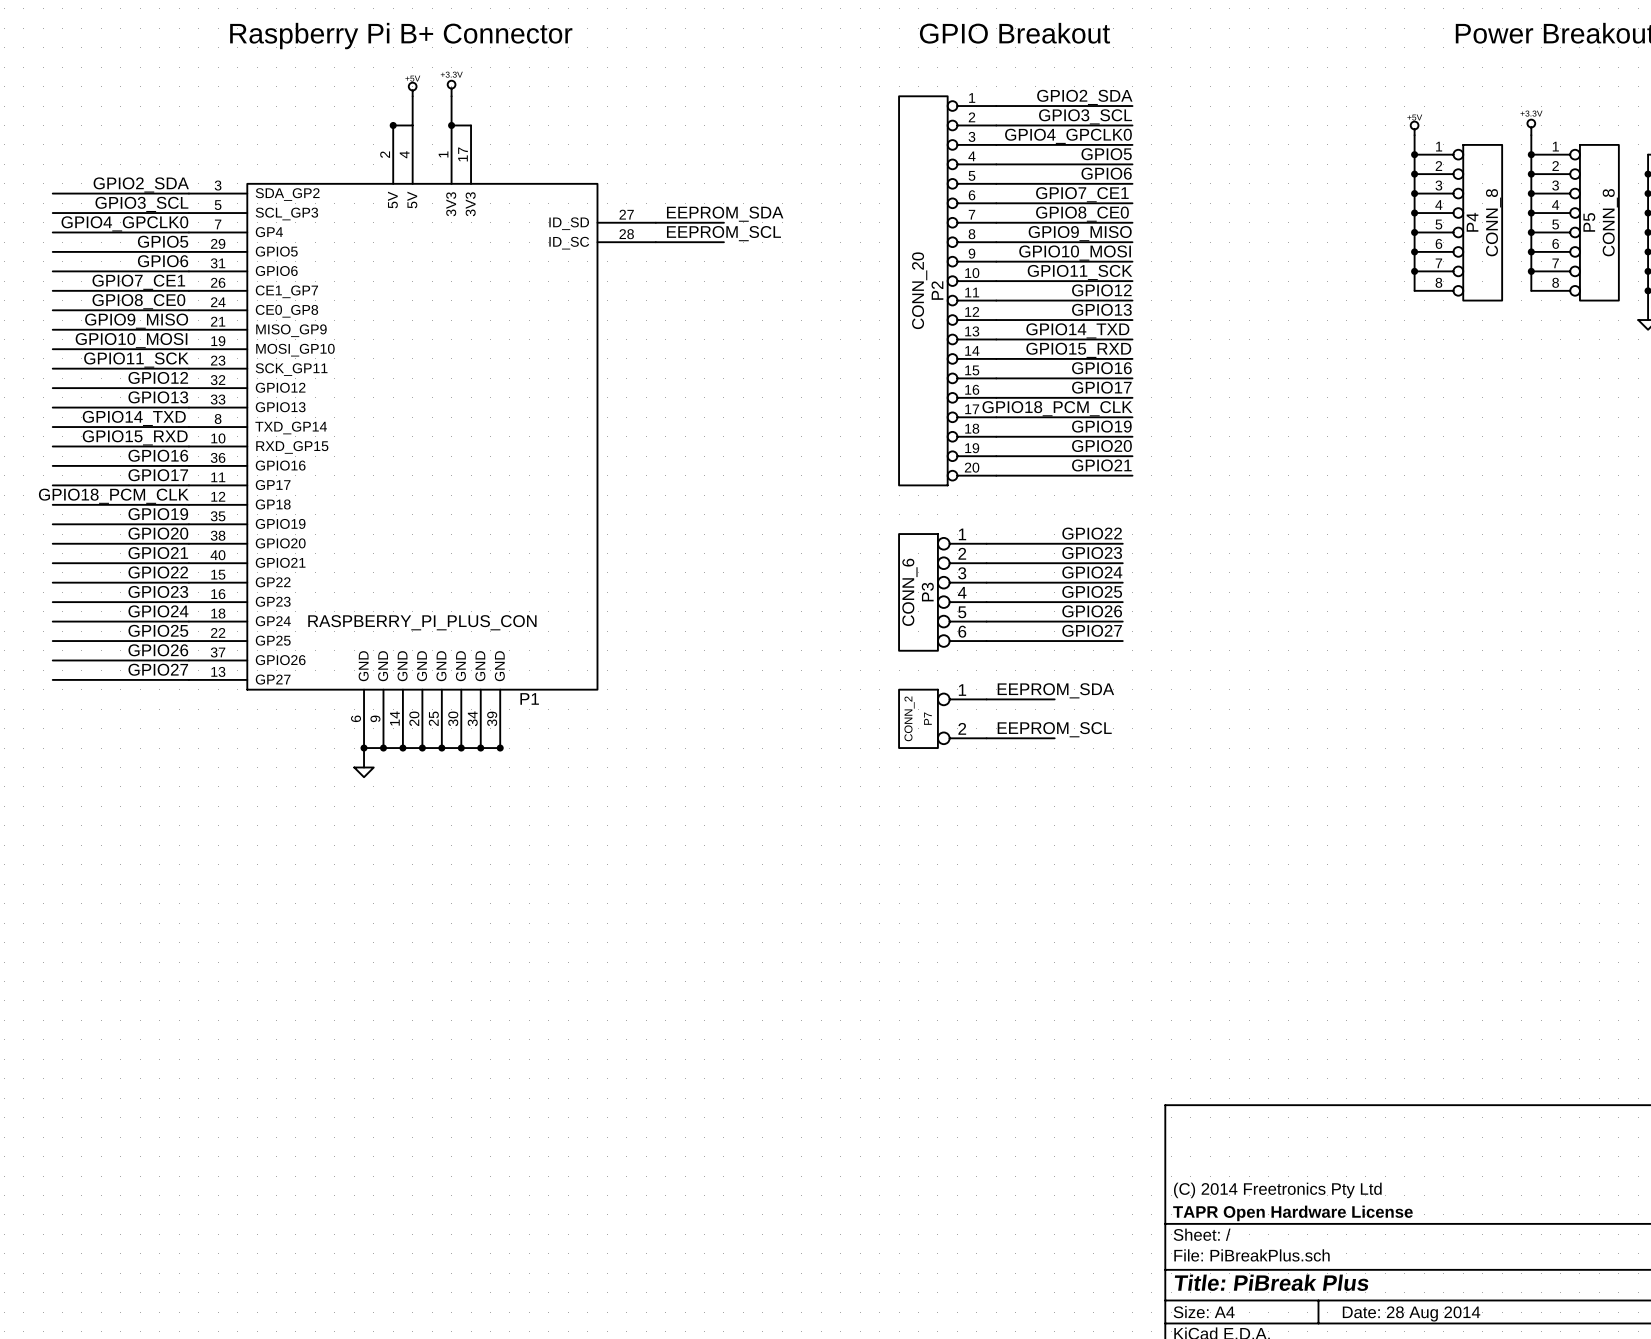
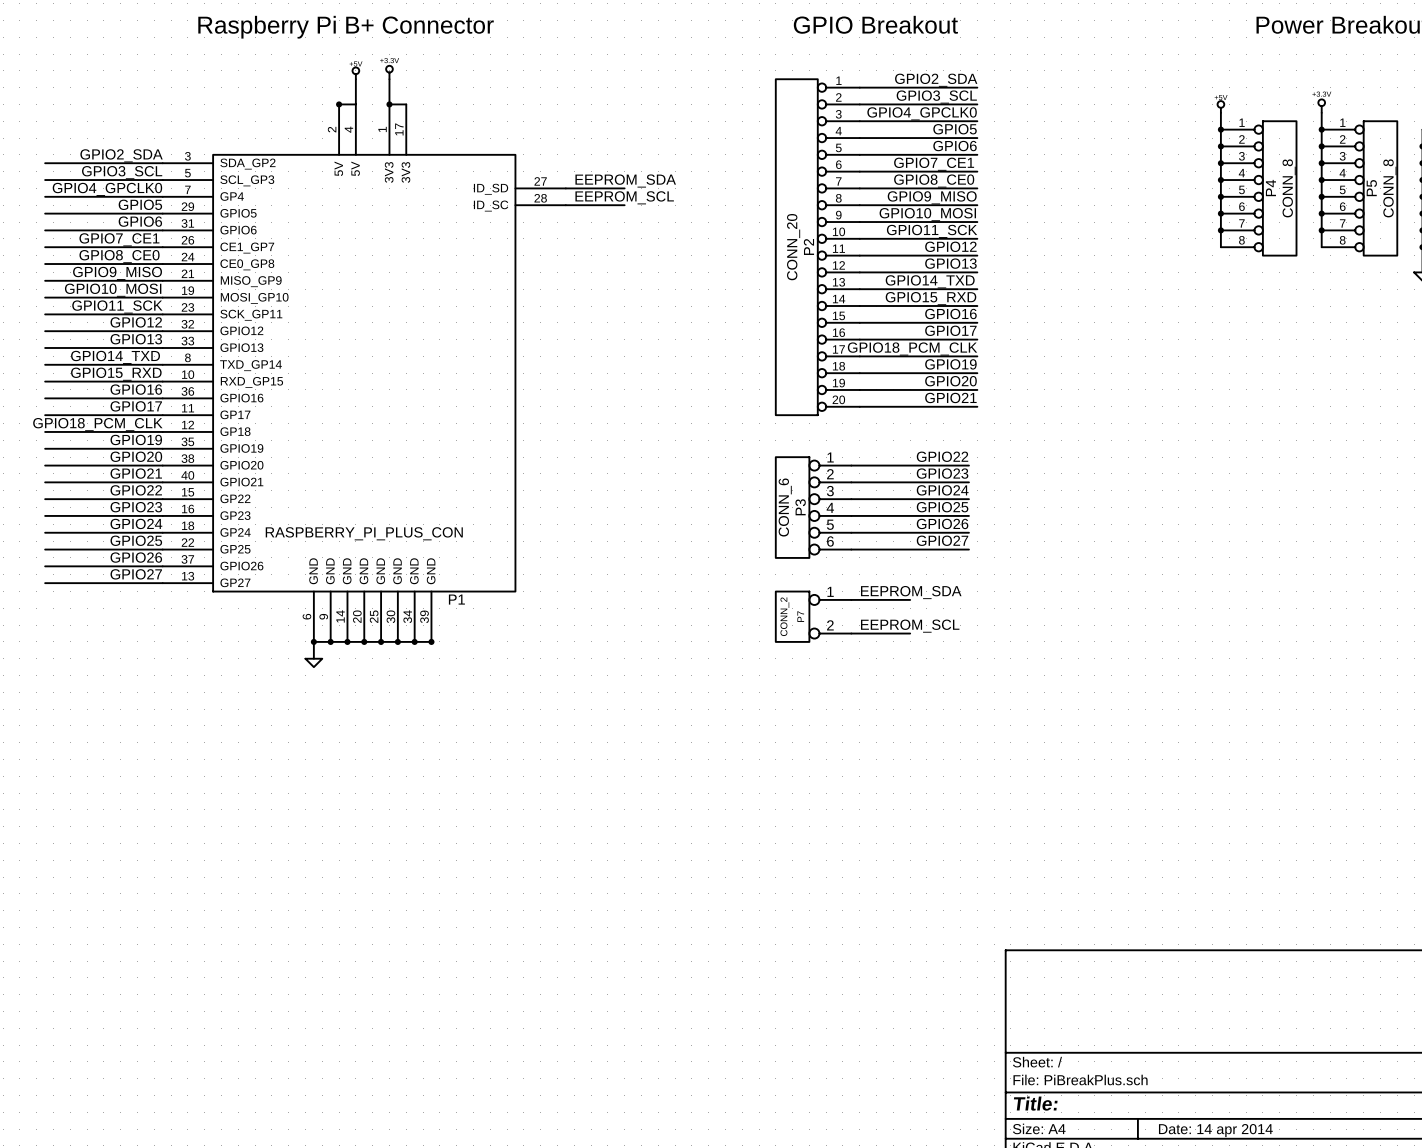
title block: (C) 2014 Freetronics Pty Ltd (1277, 1190) -> none
title block: TAPR Open Hardware License (1292, 1213) -> none
title block: Title: PiBreak Plus (1271, 1282) -> Title: (1035, 1103)
title block: Date: 28 Aug 2014 (1411, 1313) -> Date: 14 apr 2014 (1215, 1130)

